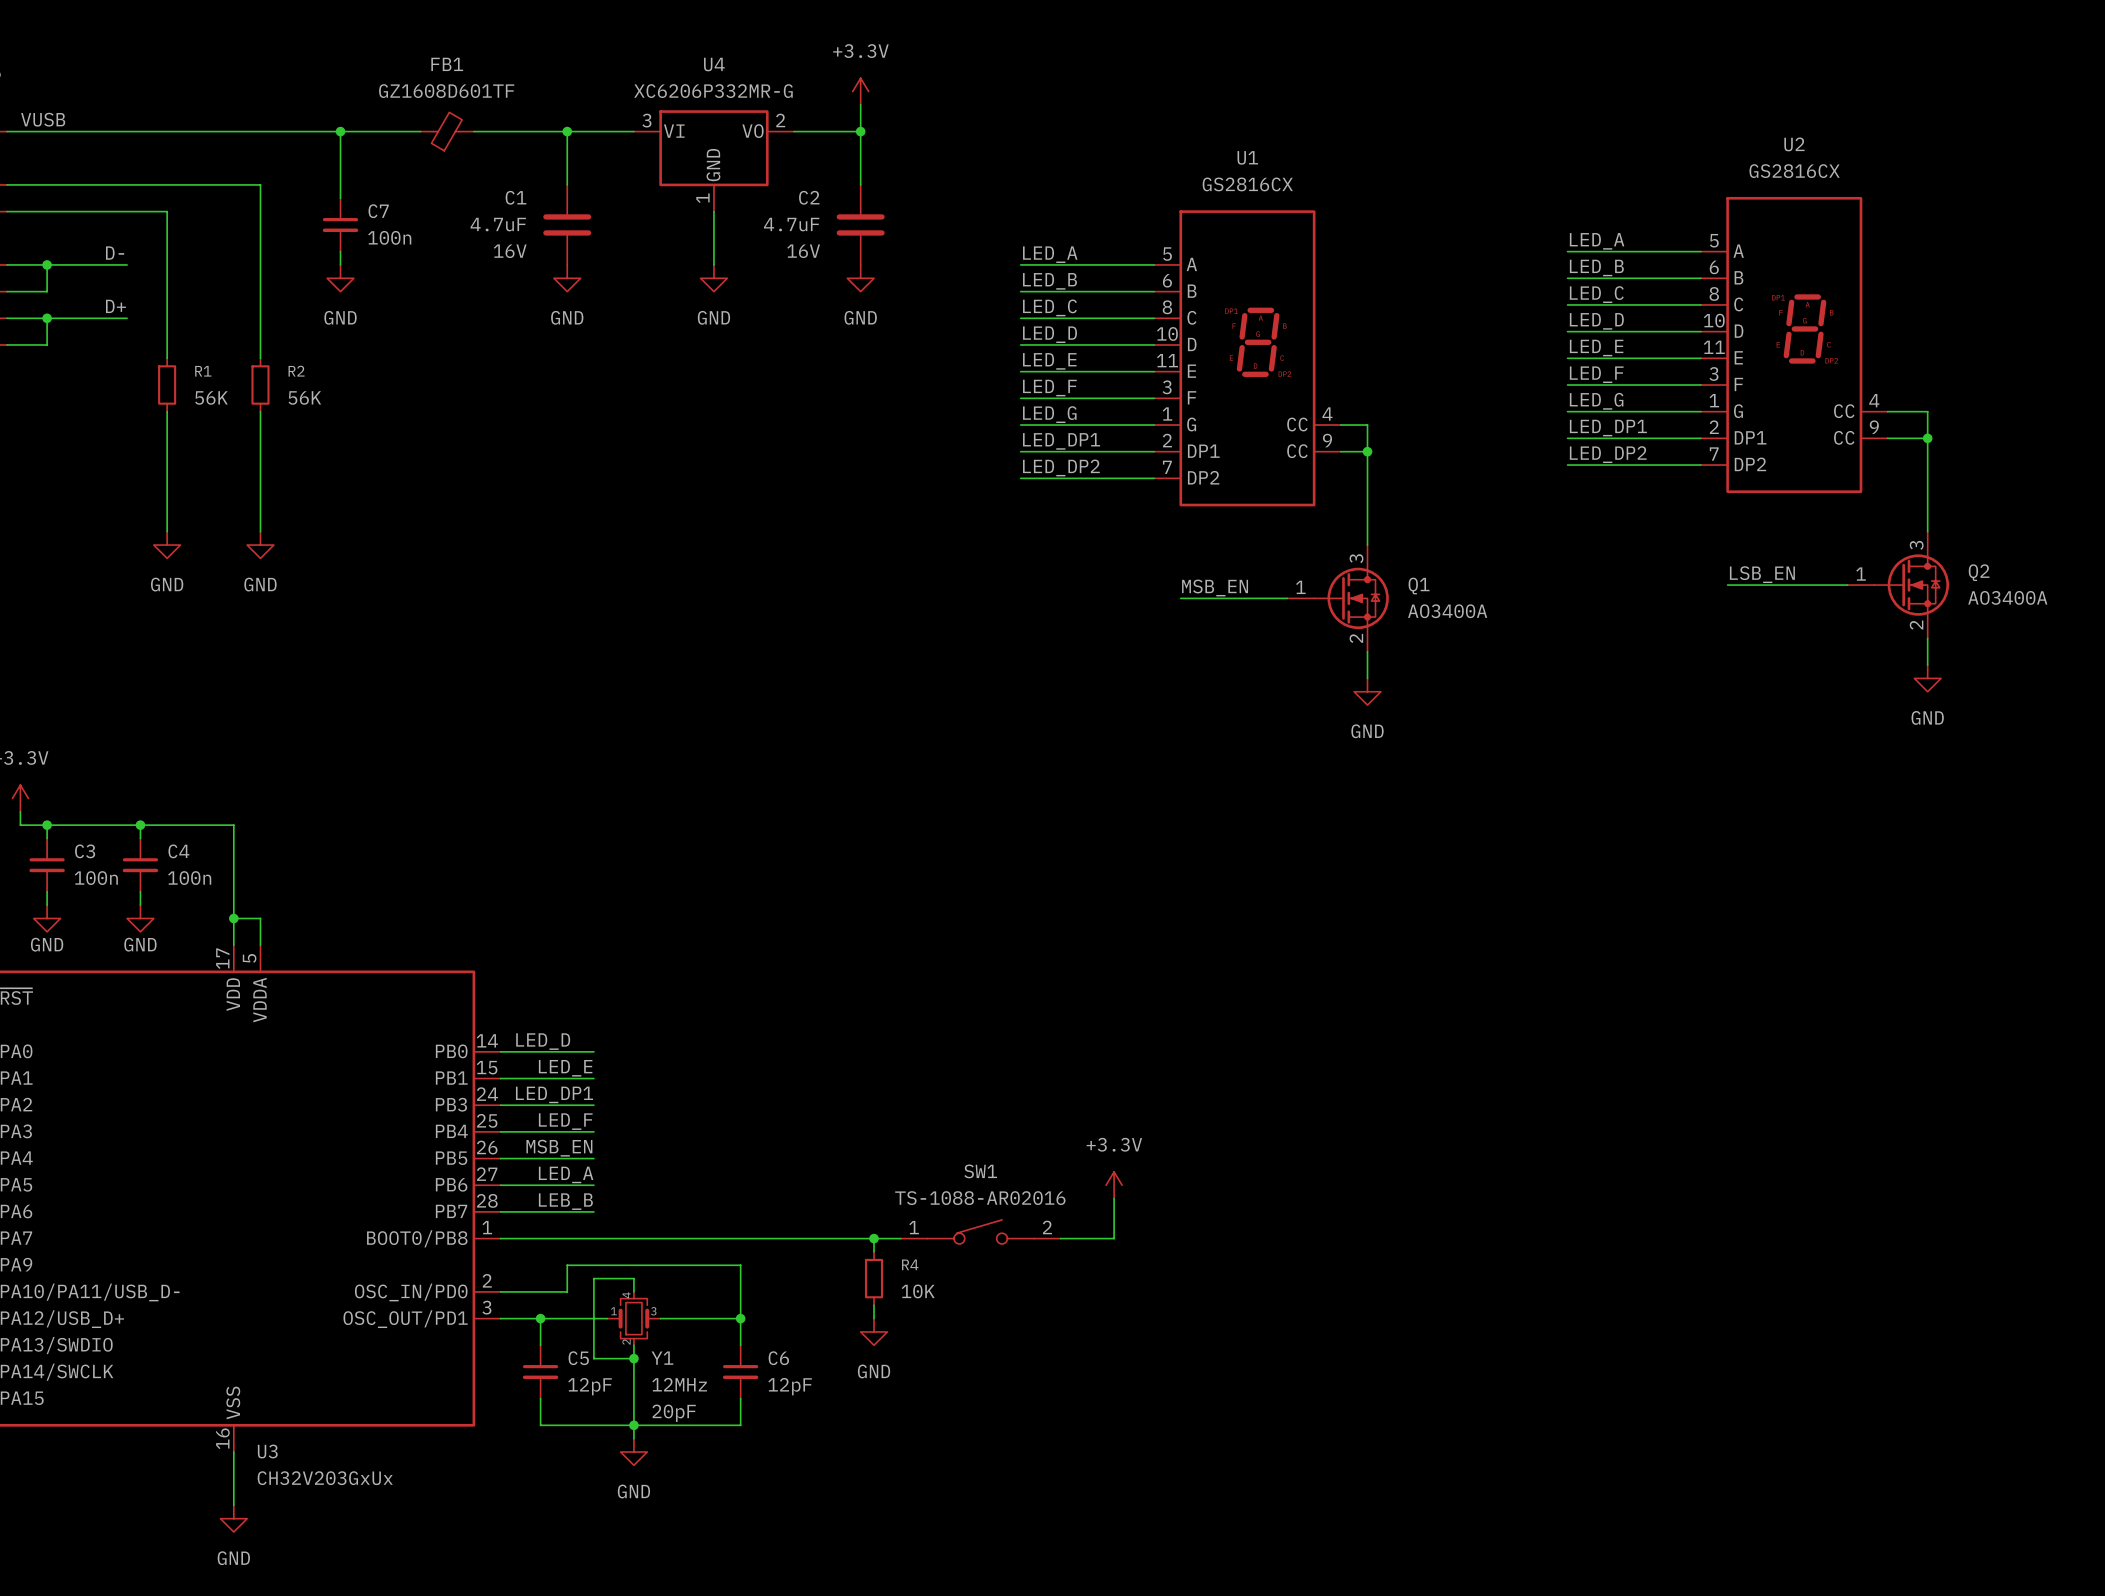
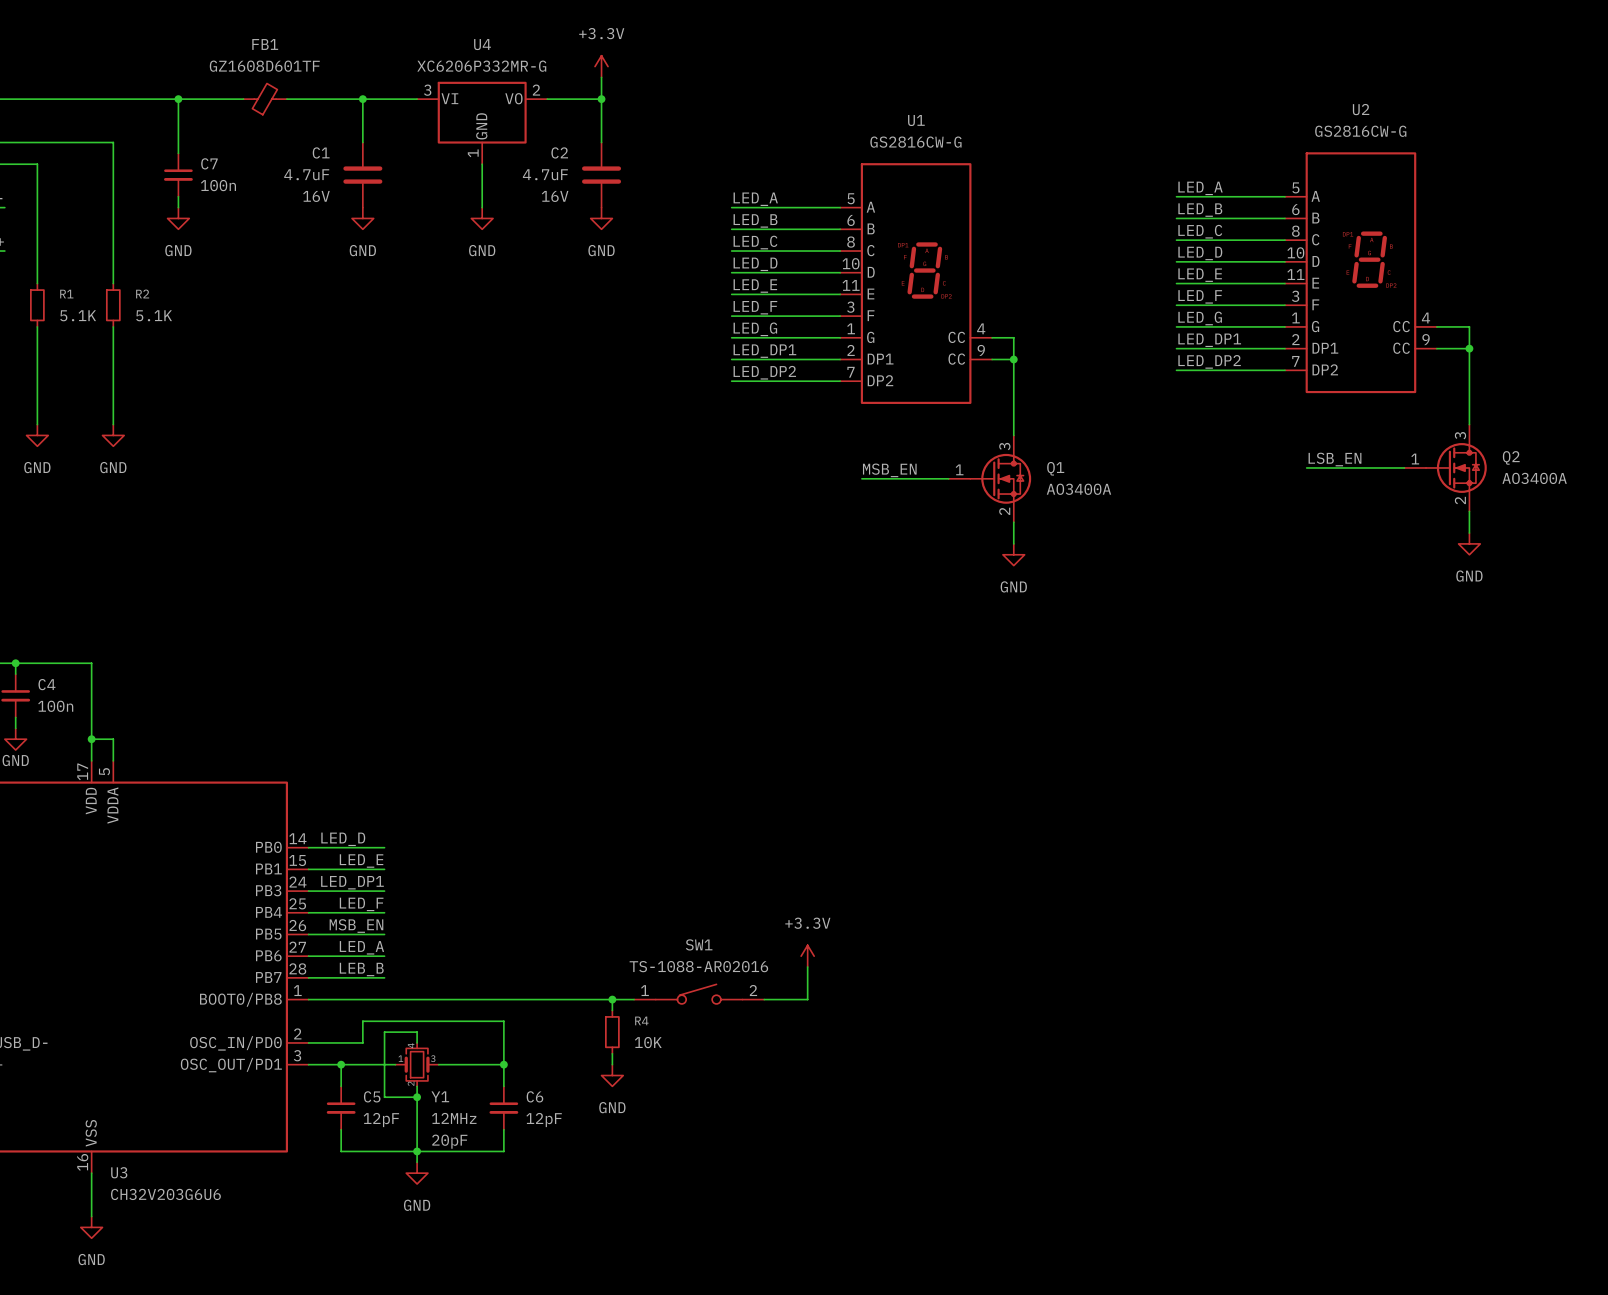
U2 value: GS2816CX (1794, 171) -> GS2816CW-G (1360, 131)
U1 value: GS2816CX (1247, 184) -> GS2816CW-G (915, 142)
R1 value: 56K (211, 397) -> 5.1K (78, 315)
R2 value: 56K (304, 397) -> 5.1K (154, 315)
U3 value: CH32V203GxUx (325, 1478) -> CH32V203G6U6 (165, 1194)

